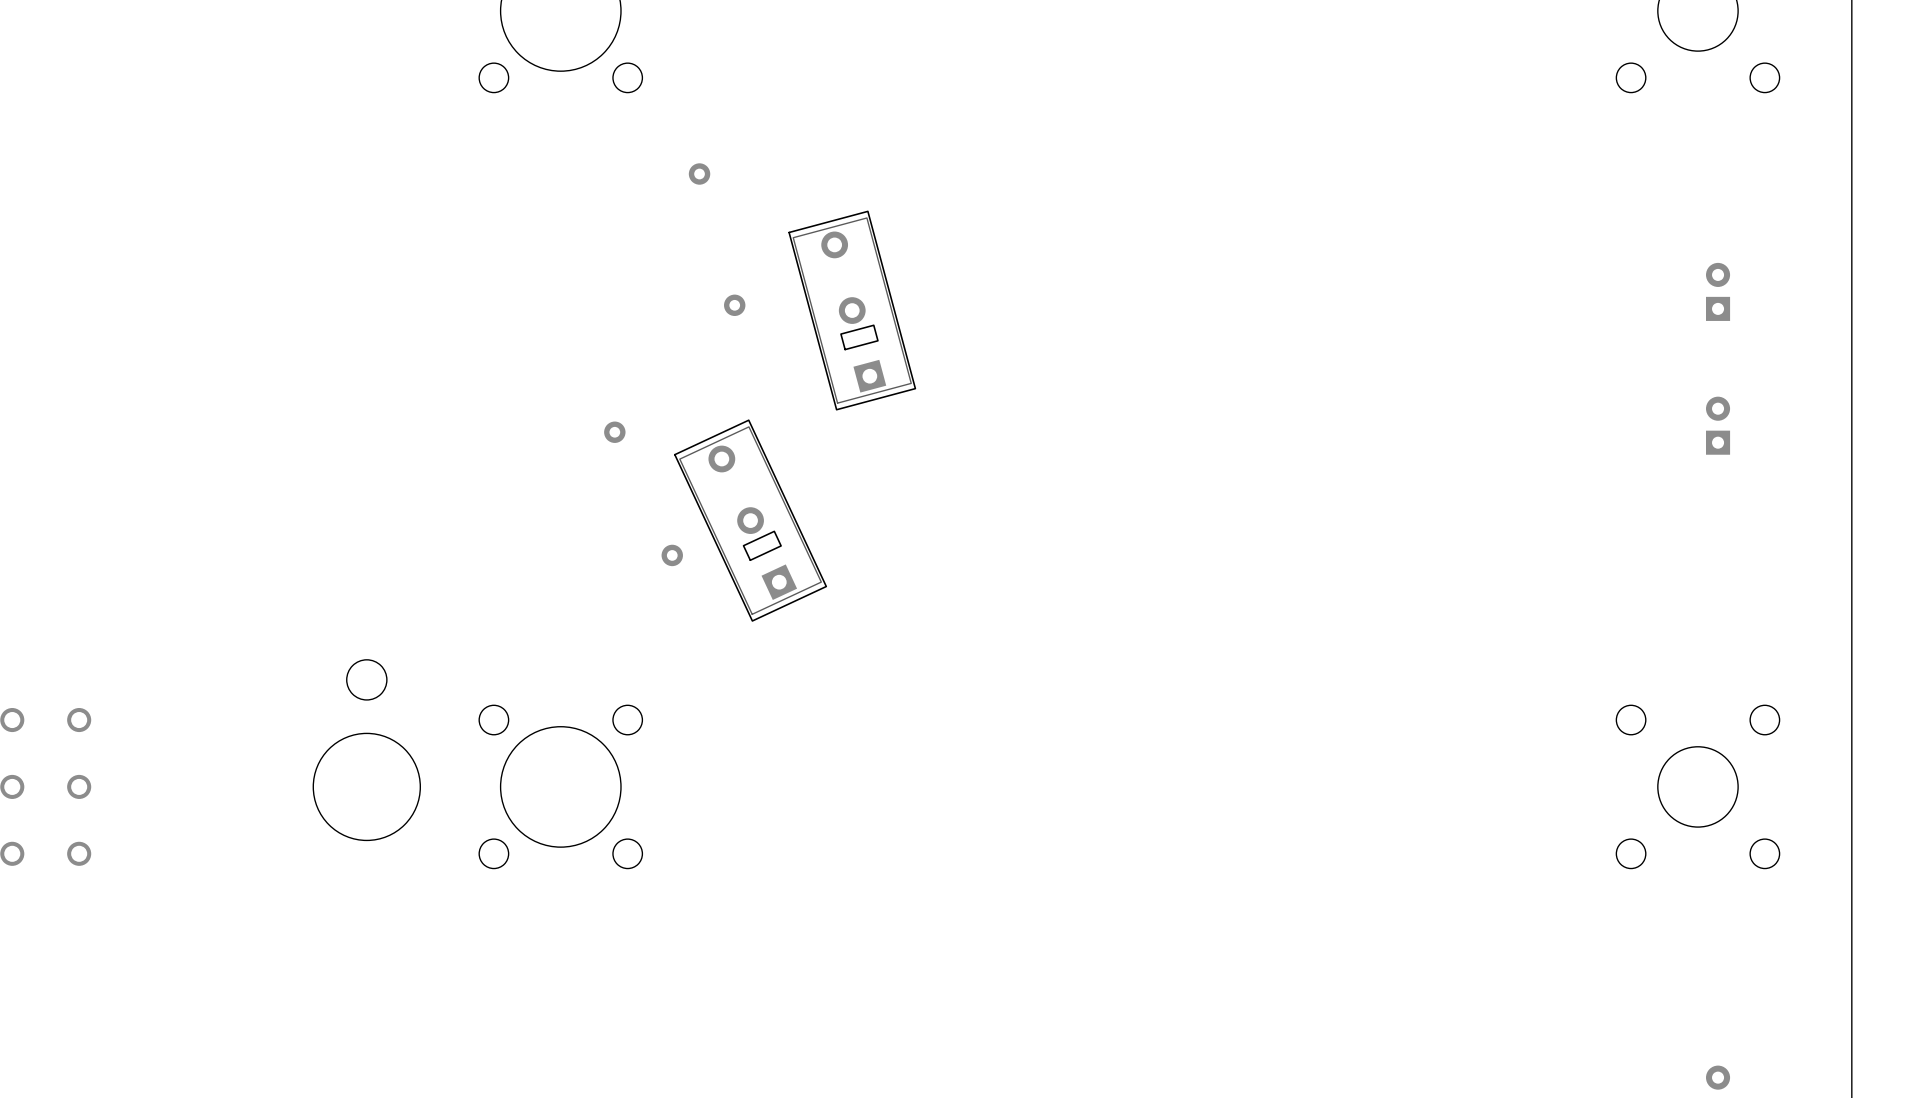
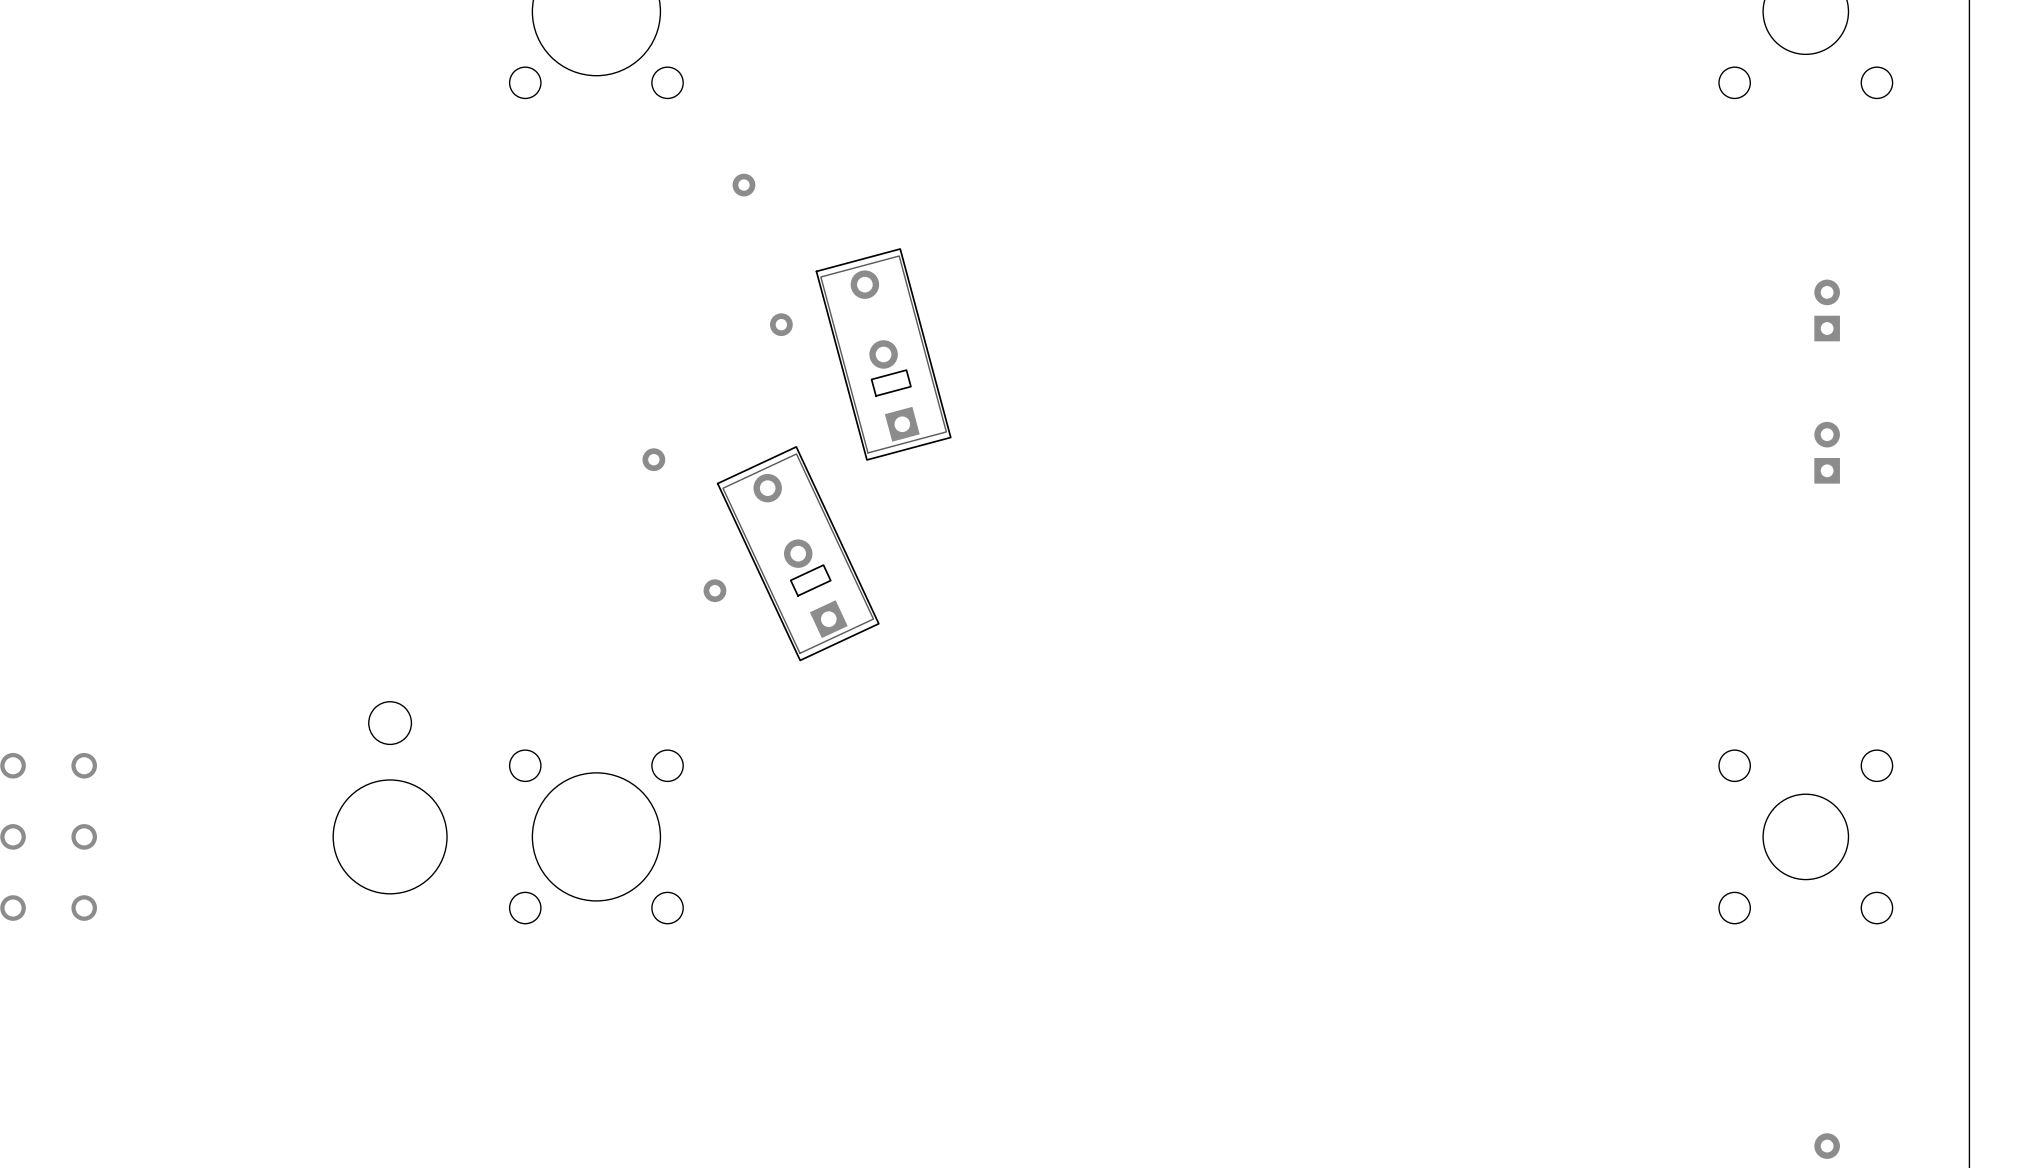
part position: (852, 310) -> (883, 354)

